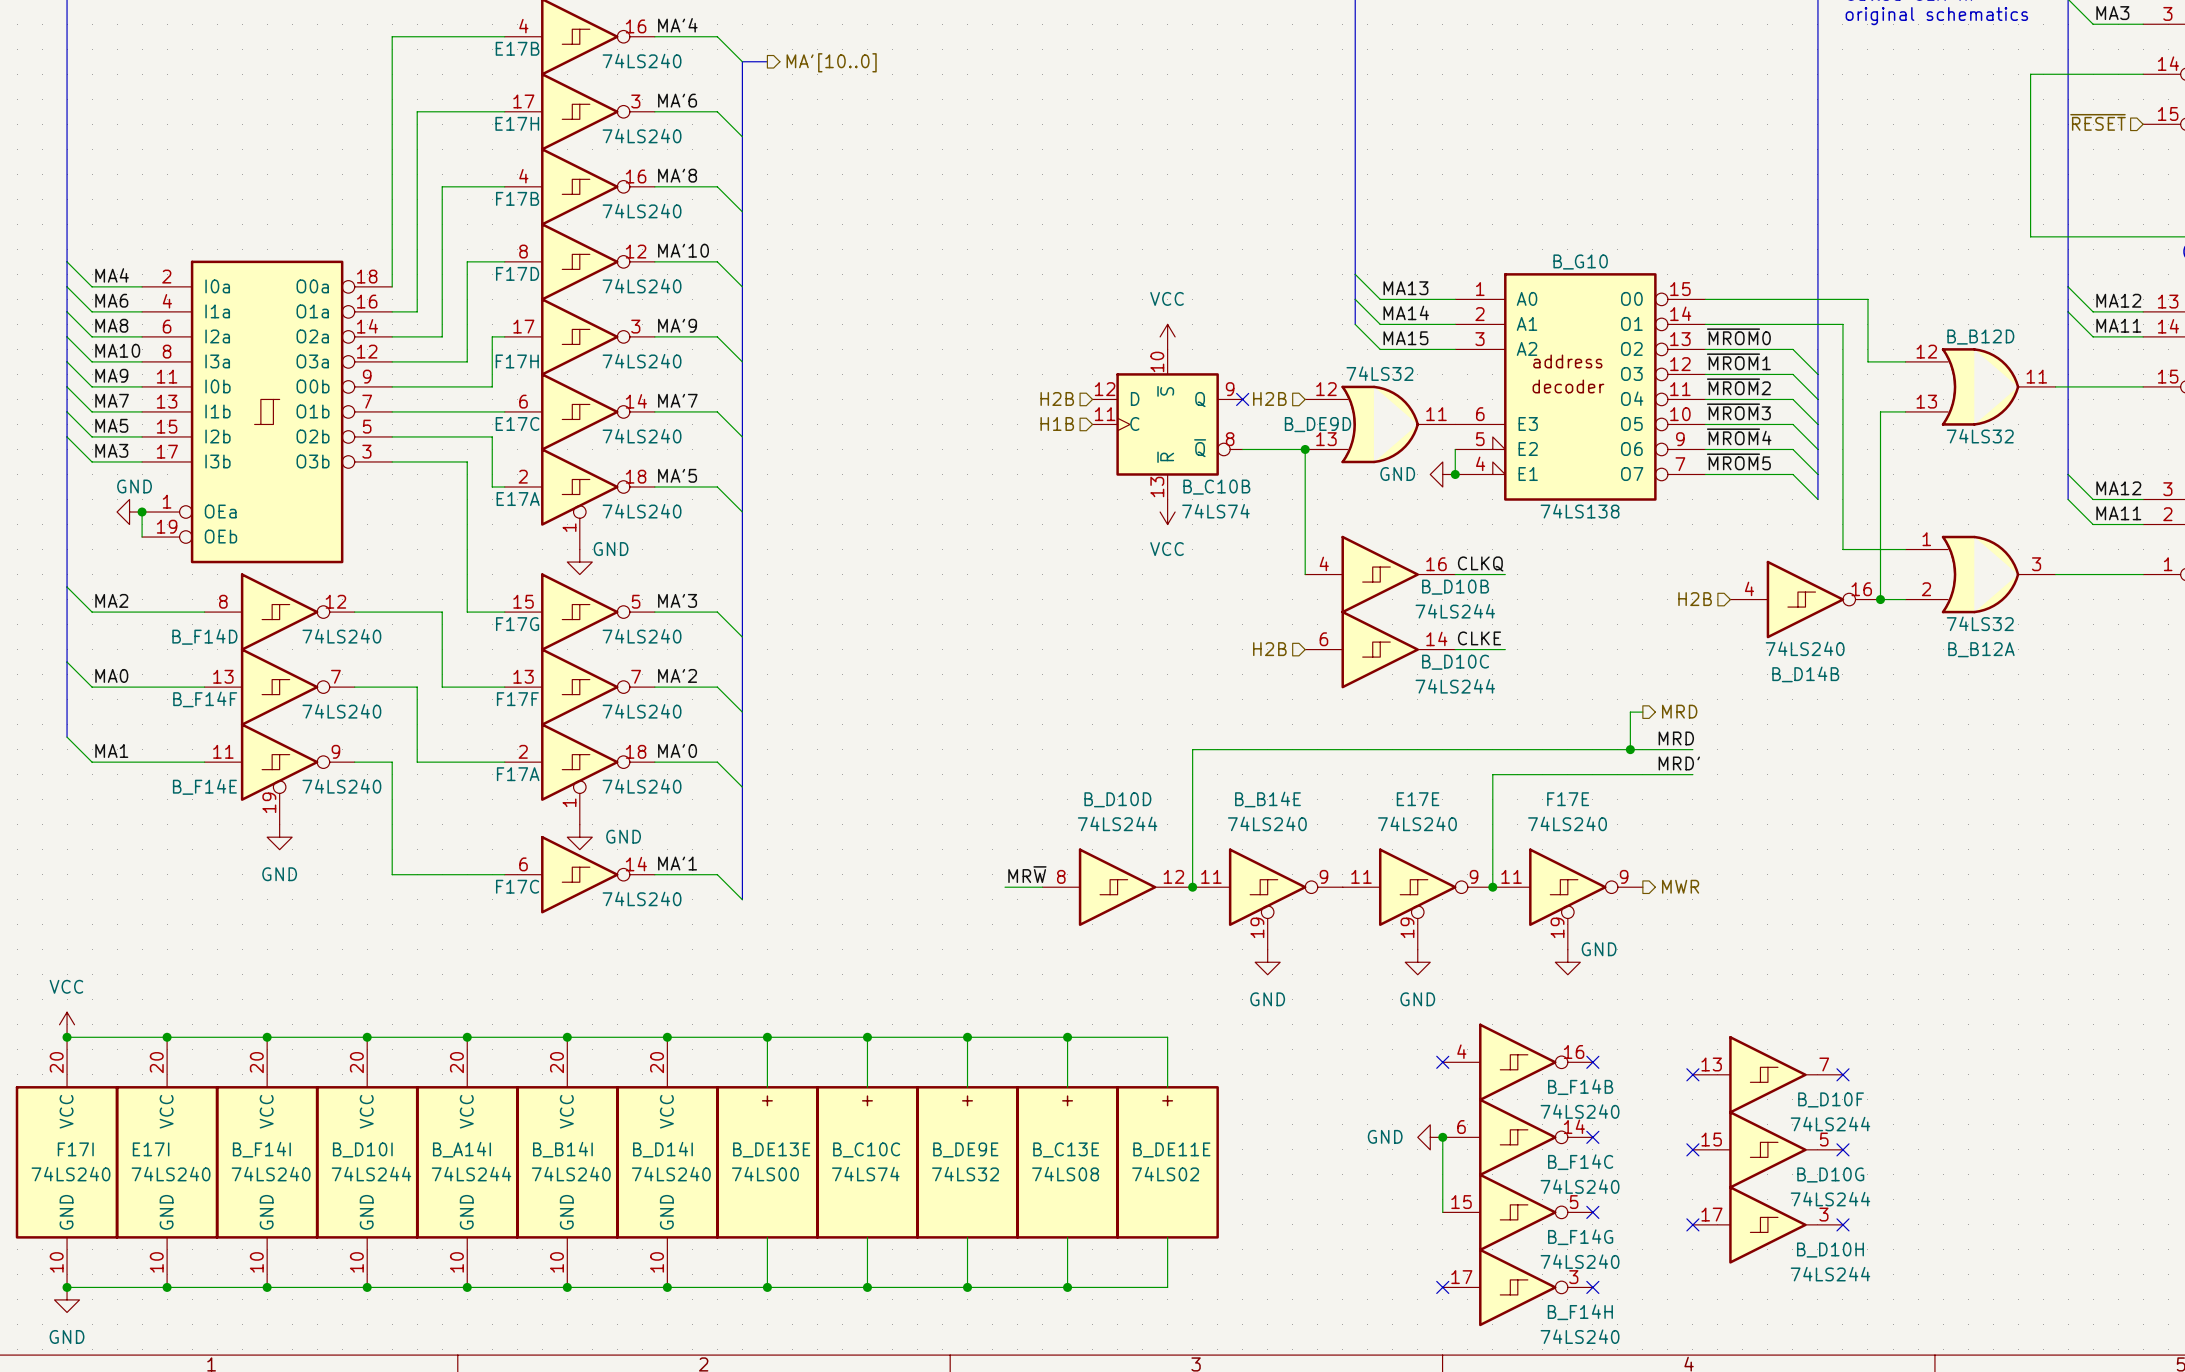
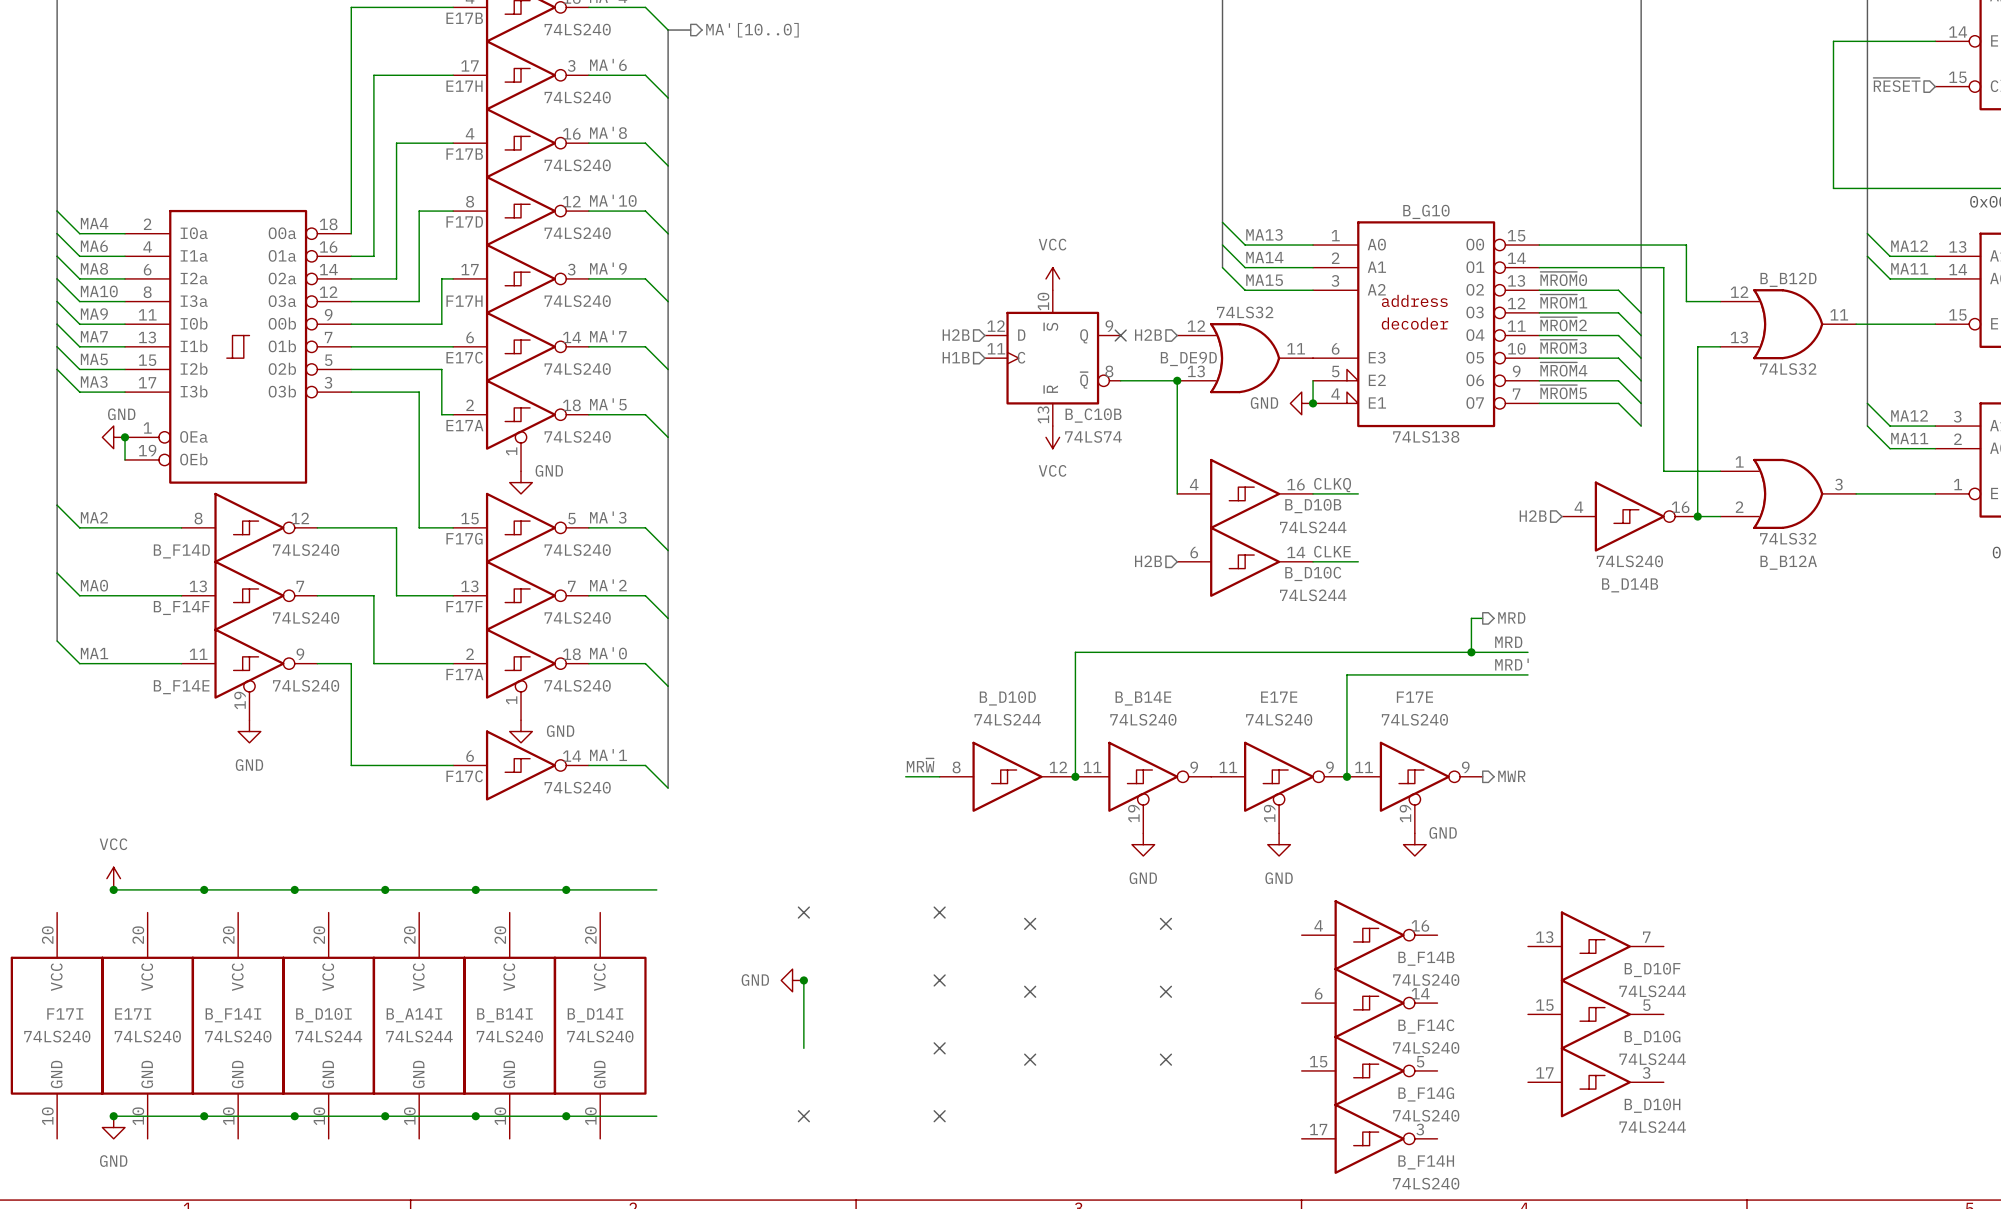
wire: none -> (113, 889) (656, 889)
junction: none -> (113, 889)
junction: none -> (204, 889)
junction: none -> (294, 889)
junction: none -> (385, 889)
junction: none -> (475, 889)
junction: none -> (566, 889)
power symbol position: VCC (67, 1024) -> VCC (113, 878)
wire: (67, 1037) (1167, 1037) (1167, 1087) -> none
junction: (67, 1037) -> none
junction: (167, 1037) -> none
junction: (267, 1037) -> none
junction: (367, 1037) -> none
junction: (467, 1037) -> none
junction: (567, 1037) -> none
junction: (667, 1037) -> none
wire: (767, 1037) (767, 1087) -> none
junction: (767, 1037) -> none
wire: (867, 1037) (867, 1087) -> none
junction: (867, 1037) -> none
no-connect mark: none -> (803, 912)
wire: (967, 1037) (967, 1087) -> none
junction: (967, 1037) -> none
no-connect mark: none -> (939, 912)
wire: (1067, 1037) (1067, 1087) -> none
junction: (1067, 1037) -> none
no-connect mark: none -> (1030, 923)
no-connect mark: none -> (1165, 923)
no-connect mark: (1442, 1062) -> none
no-connect mark: (1592, 1062) -> none
no-connect mark: (1692, 1074) -> none
no-connect mark: (1842, 1074) -> none
power symbol: none -> GND (792, 980)
junction: none -> (803, 980)
no-connect mark: none -> (939, 980)
no-connect mark: none -> (1030, 991)
no-connect mark: none -> (1165, 991)
power symbol: GND (1430, 1137) -> none
wire: (1442, 1137) (1442, 1212) -> none
junction: (1442, 1137) -> none
no-connect mark: (1592, 1137) -> none
no-connect mark: (1692, 1149) -> none
no-connect mark: (1842, 1149) -> none
B_DE13E: 74LS00 (767, 1162) -> none
B_C10C: 74LS74 (867, 1162) -> none
B_DE9E: 74LS32 (967, 1162) -> none
B_C13E: 74LS08 (1067, 1162) -> none
B_DE11E: 74LS02 (1167, 1162) -> none
no-connect mark: none -> (939, 1048)
no-connect mark: none -> (1030, 1059)
no-connect mark: none -> (1165, 1059)
no-connect mark: (1592, 1212) -> none
no-connect mark: (1692, 1224) -> none
no-connect mark: (1842, 1224) -> none
wire: (767, 1237) (767, 1287) -> none
wire: (867, 1237) (867, 1287) -> none
wire: (967, 1237) (967, 1287) -> none
wire: (1067, 1237) (1067, 1287) -> none
wire: (1167, 1237) (1167, 1287) (67, 1287) -> none
wire: none -> (113, 1116) (656, 1116)
junction: none -> (113, 1116)
junction: none -> (204, 1116)
junction: none -> (294, 1116)
junction: none -> (385, 1116)
junction: none -> (475, 1116)
junction: none -> (566, 1116)
no-connect mark: none -> (803, 1116)
no-connect mark: none -> (939, 1116)
junction: (67, 1287) -> none
junction: (167, 1287) -> none
junction: (267, 1287) -> none
junction: (367, 1287) -> none
junction: (467, 1287) -> none
junction: (567, 1287) -> none
junction: (667, 1287) -> none
junction: (767, 1287) -> none
junction: (867, 1287) -> none
junction: (967, 1287) -> none
junction: (1067, 1287) -> none
no-connect mark: (1442, 1287) -> none
no-connect mark: (1592, 1287) -> none
power symbol position: GND (67, 1299) -> GND (113, 1127)

